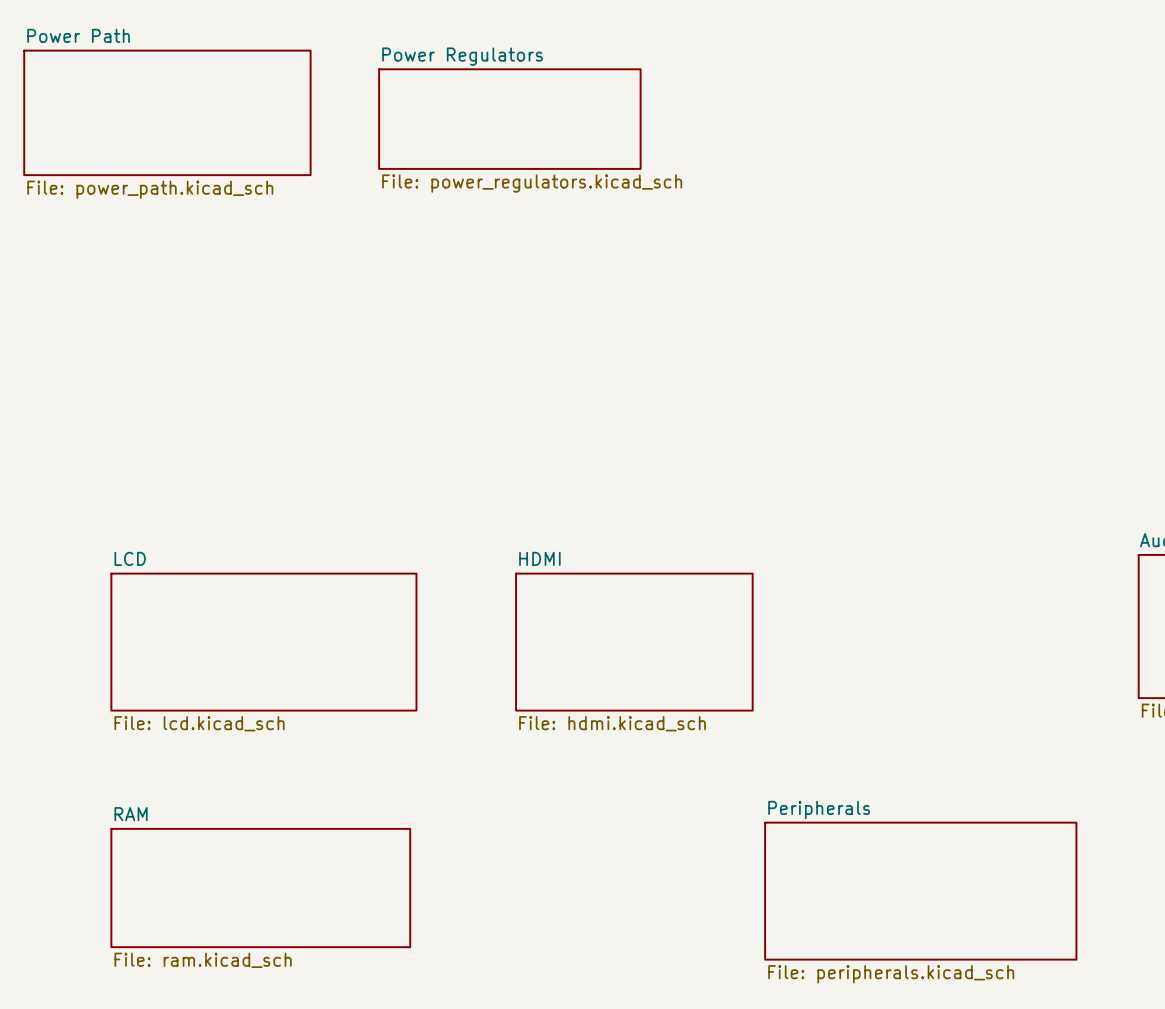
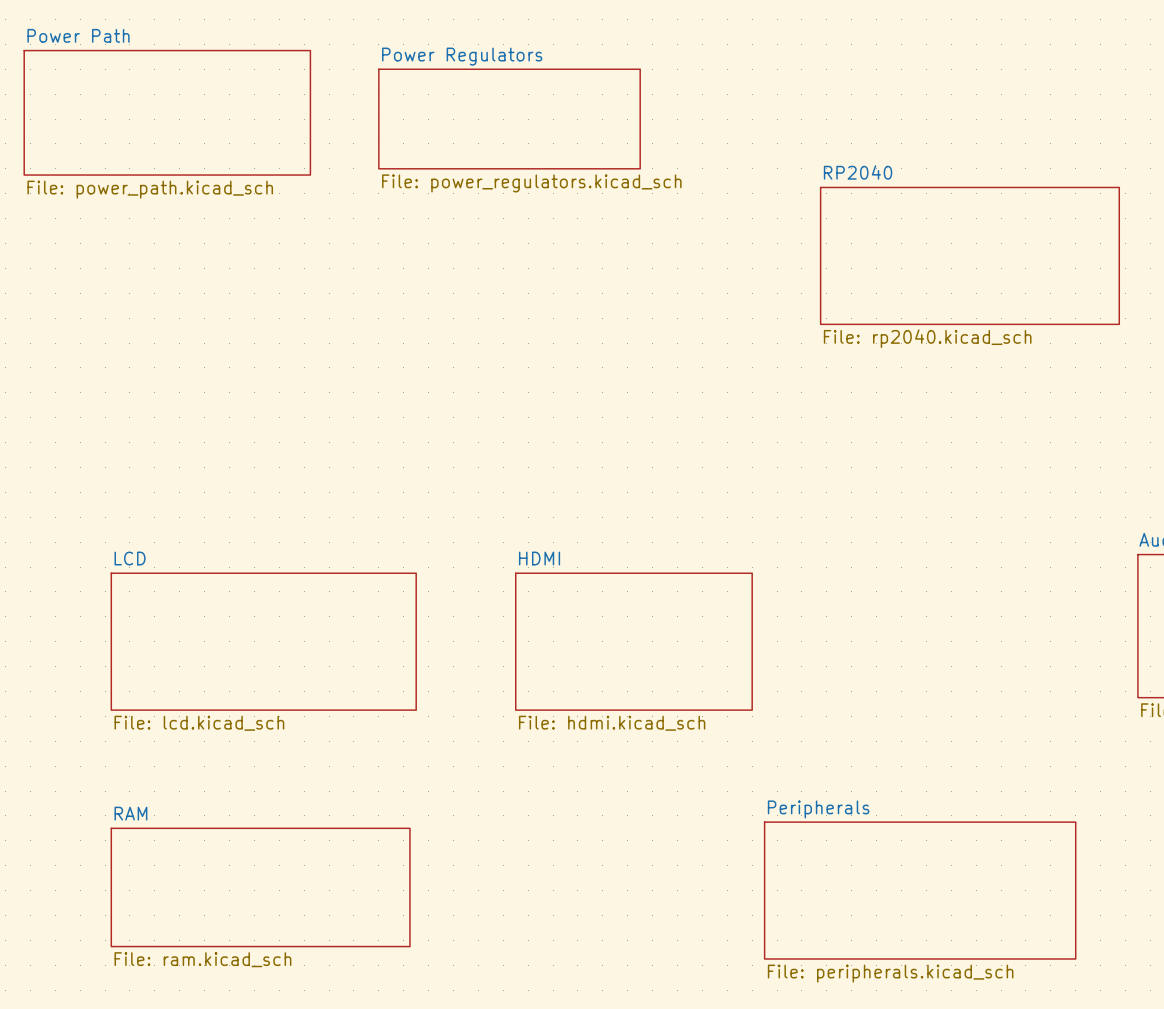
sheet RP2040: none -> File: rp2040.kicad_sch (969, 255)

